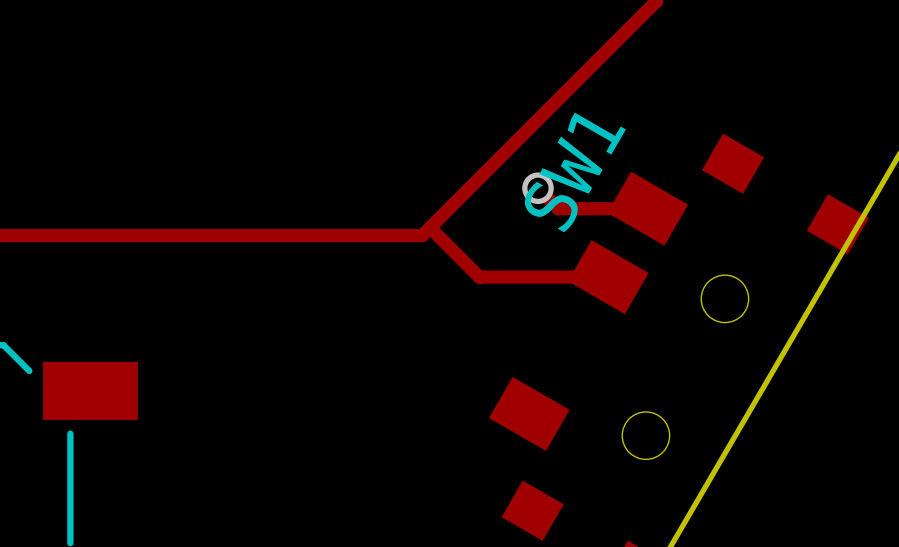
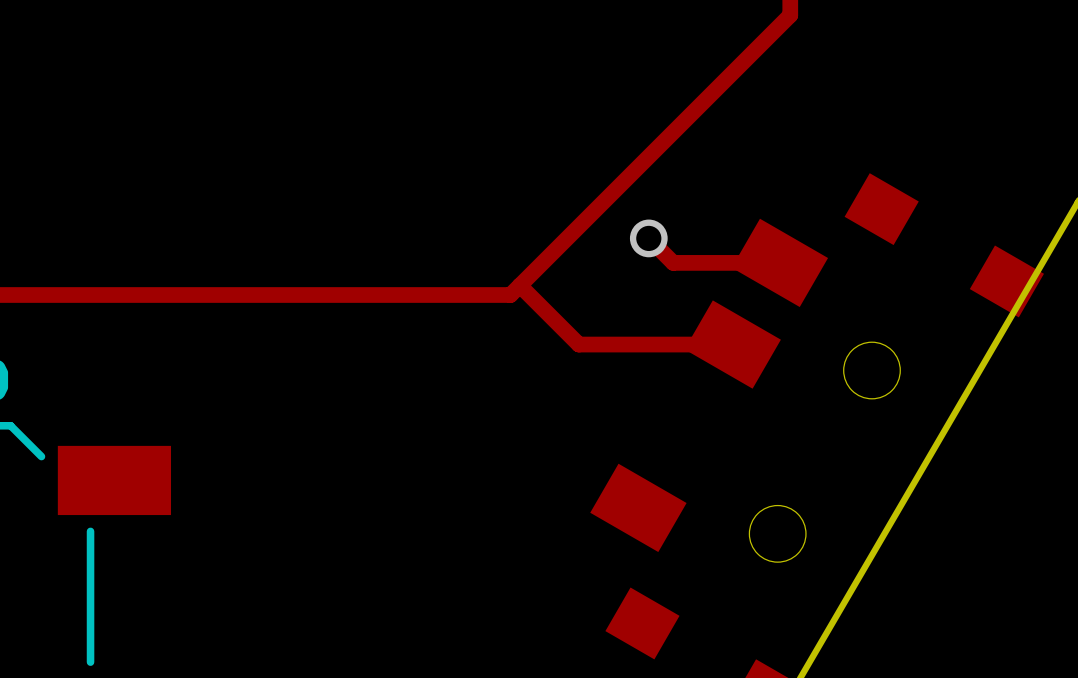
SW1 name: SW1 (574, 172) -> none

